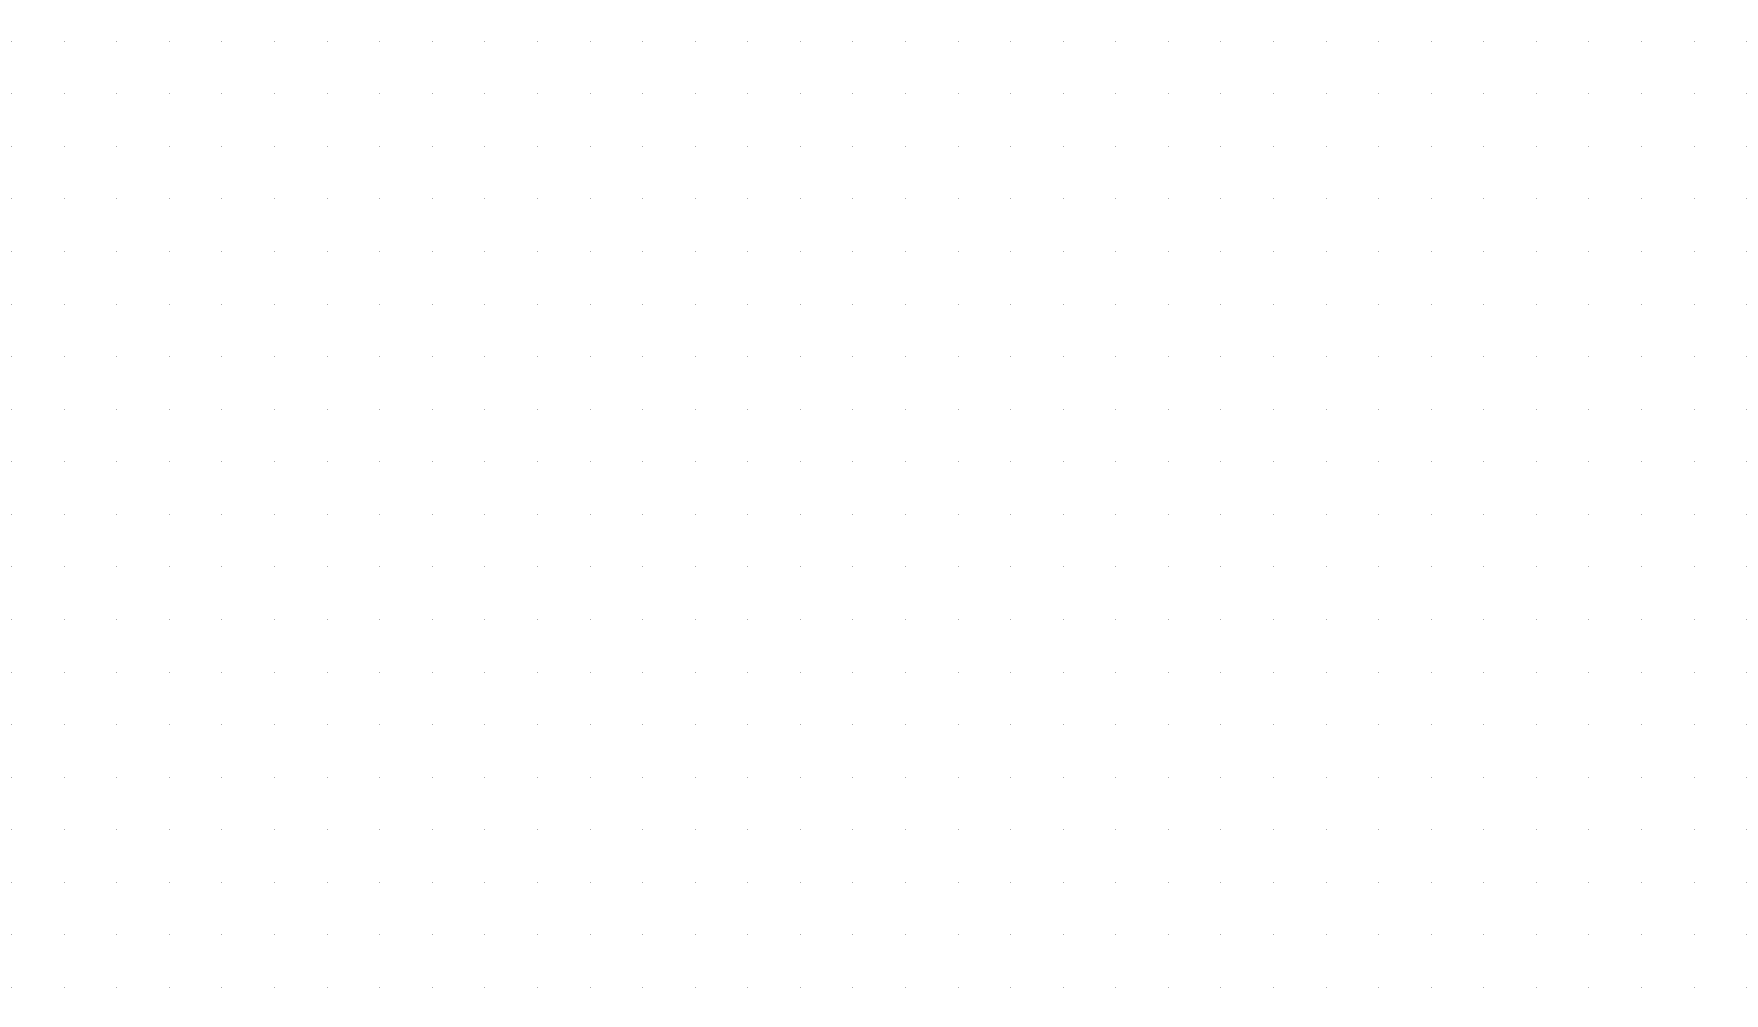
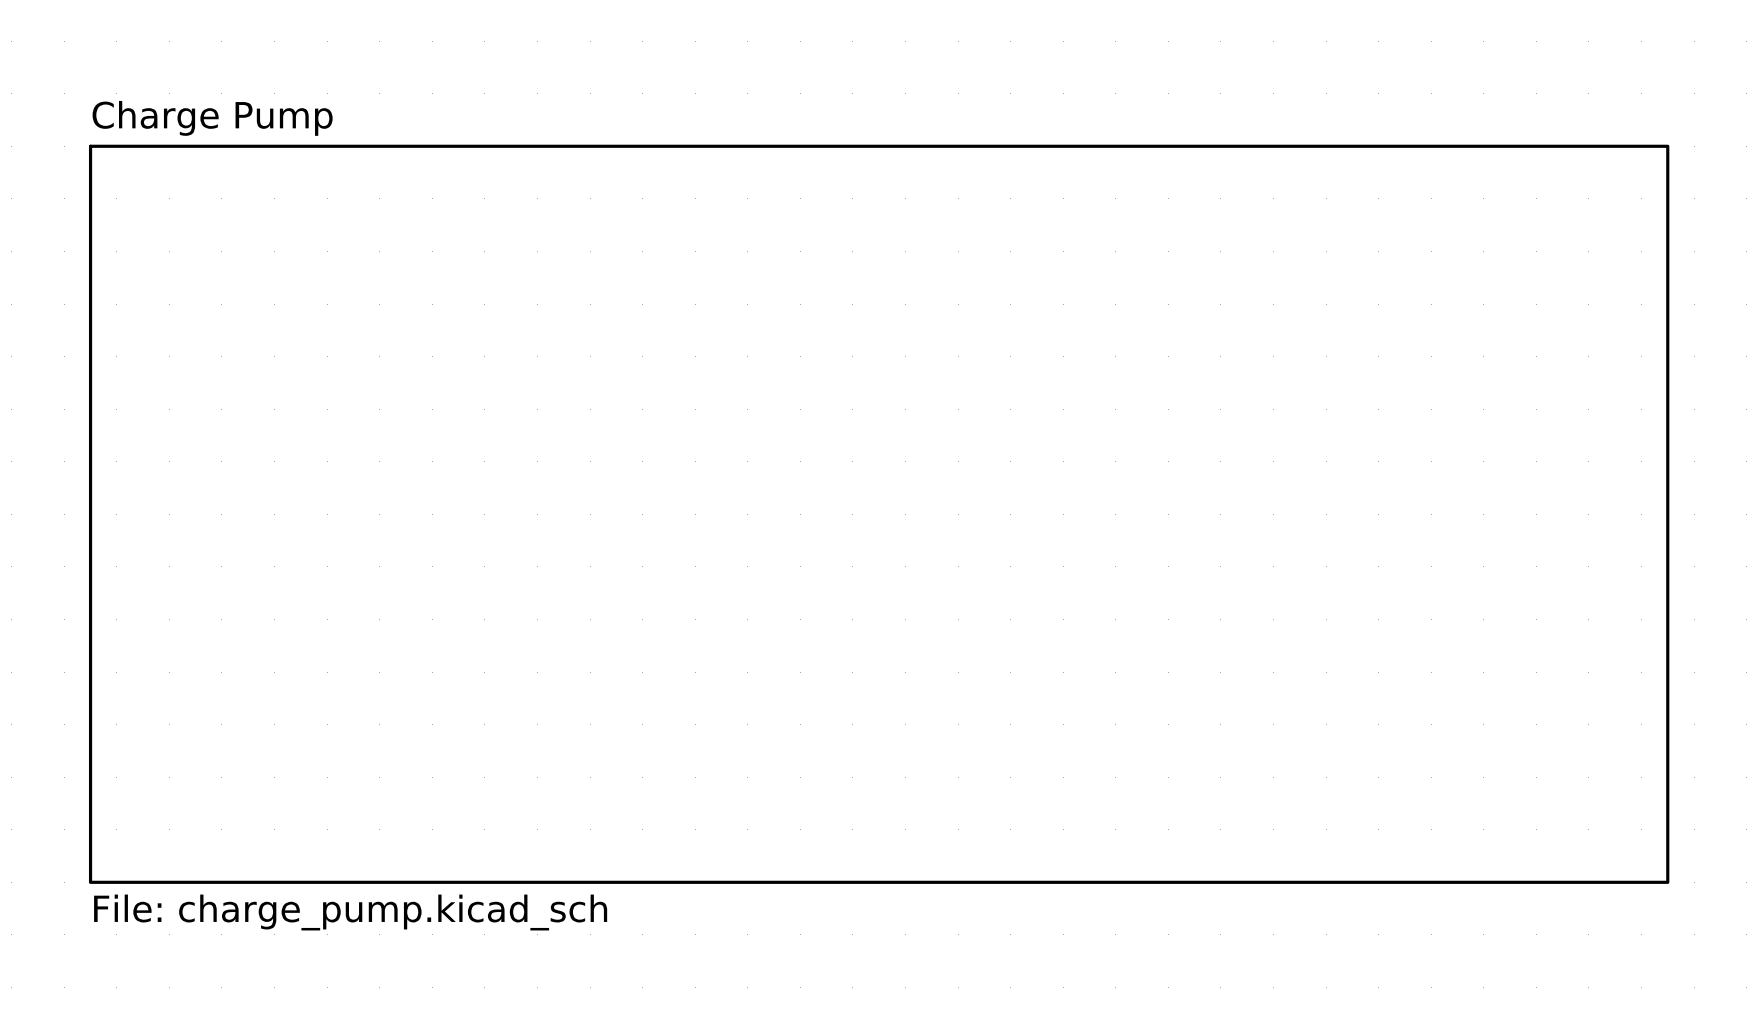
sheet Charge Pump: none -> File: charge_pump.kicad_sch (879, 514)

